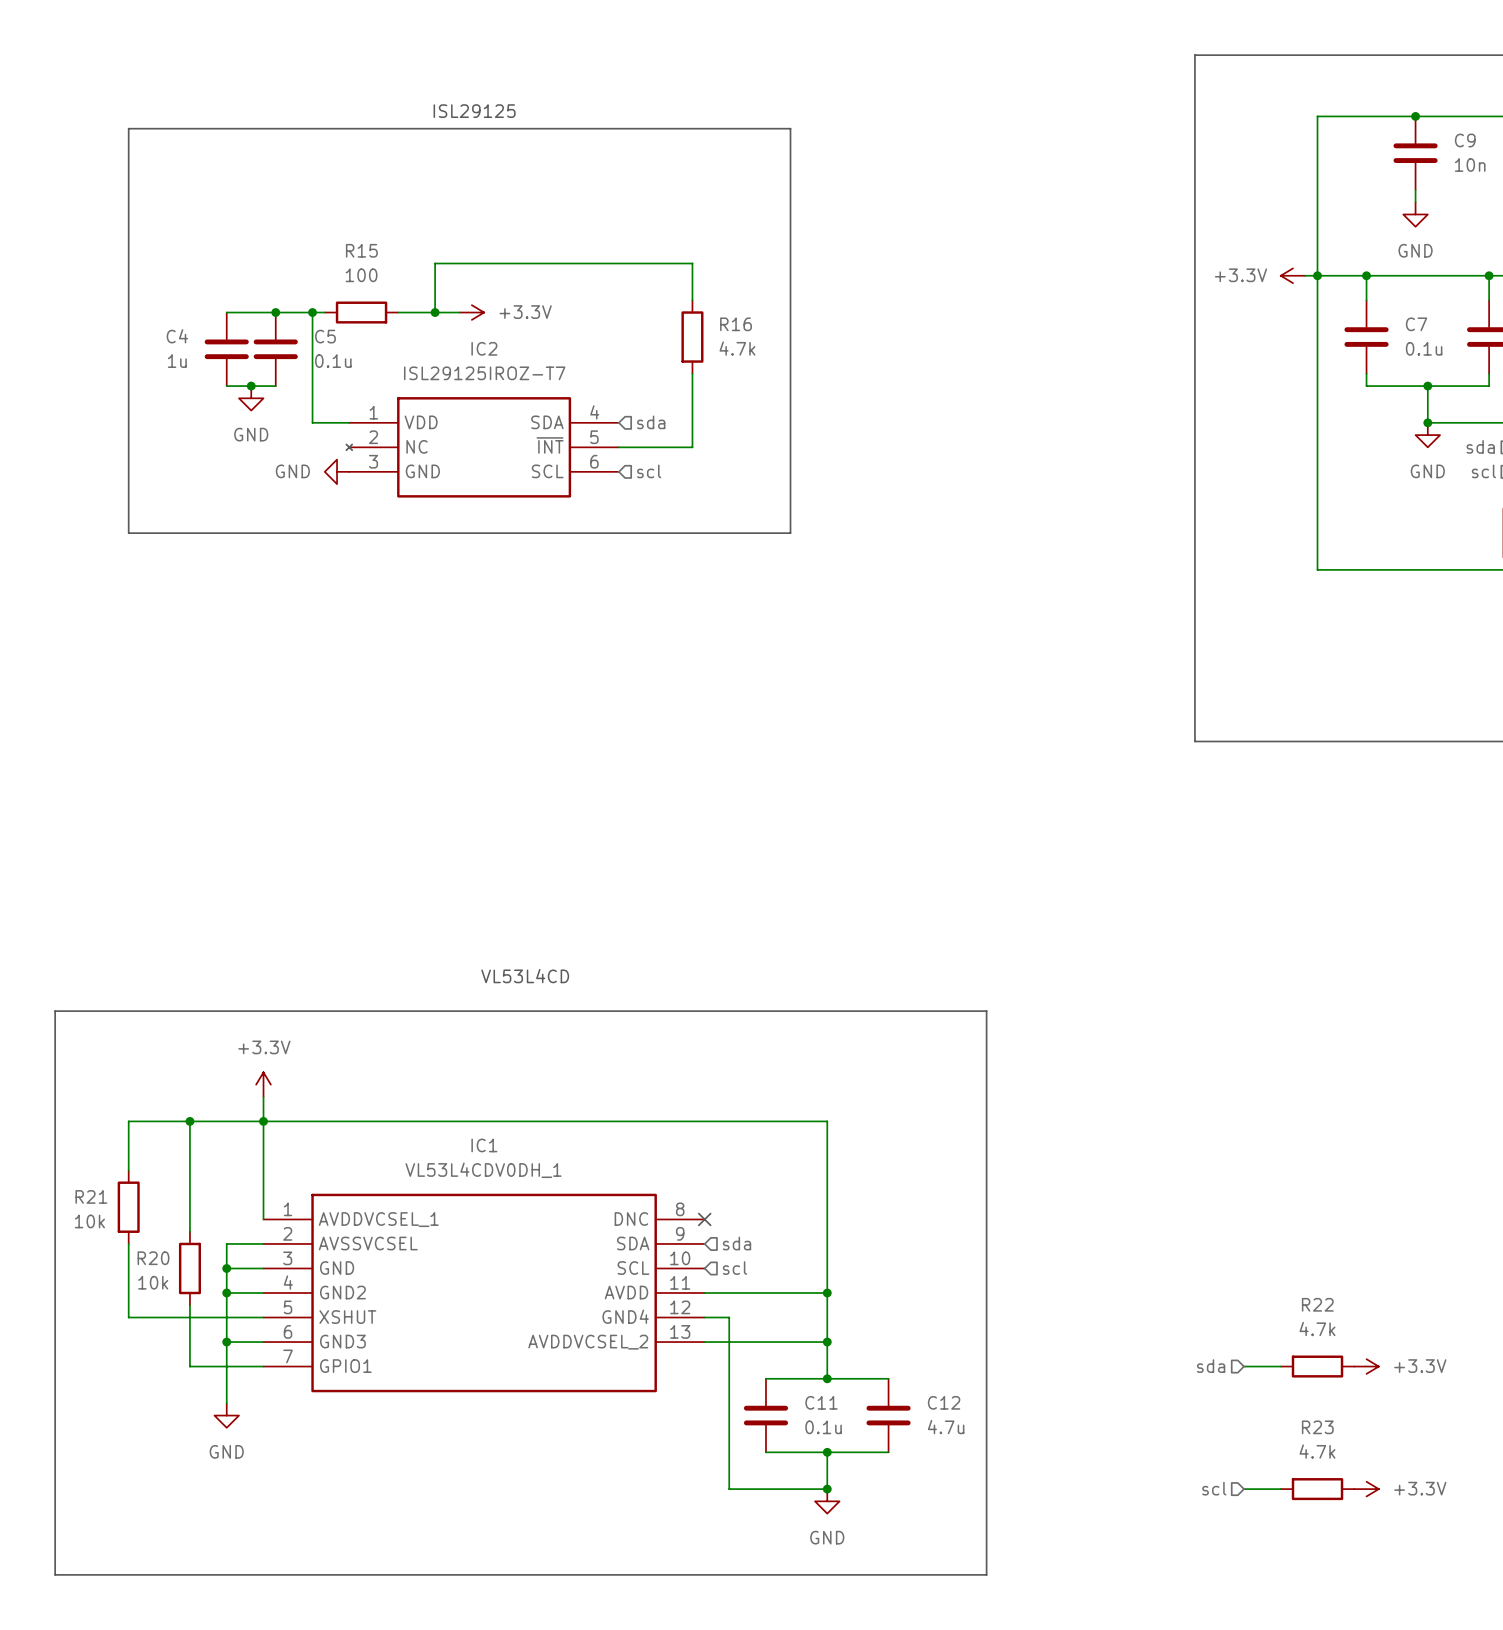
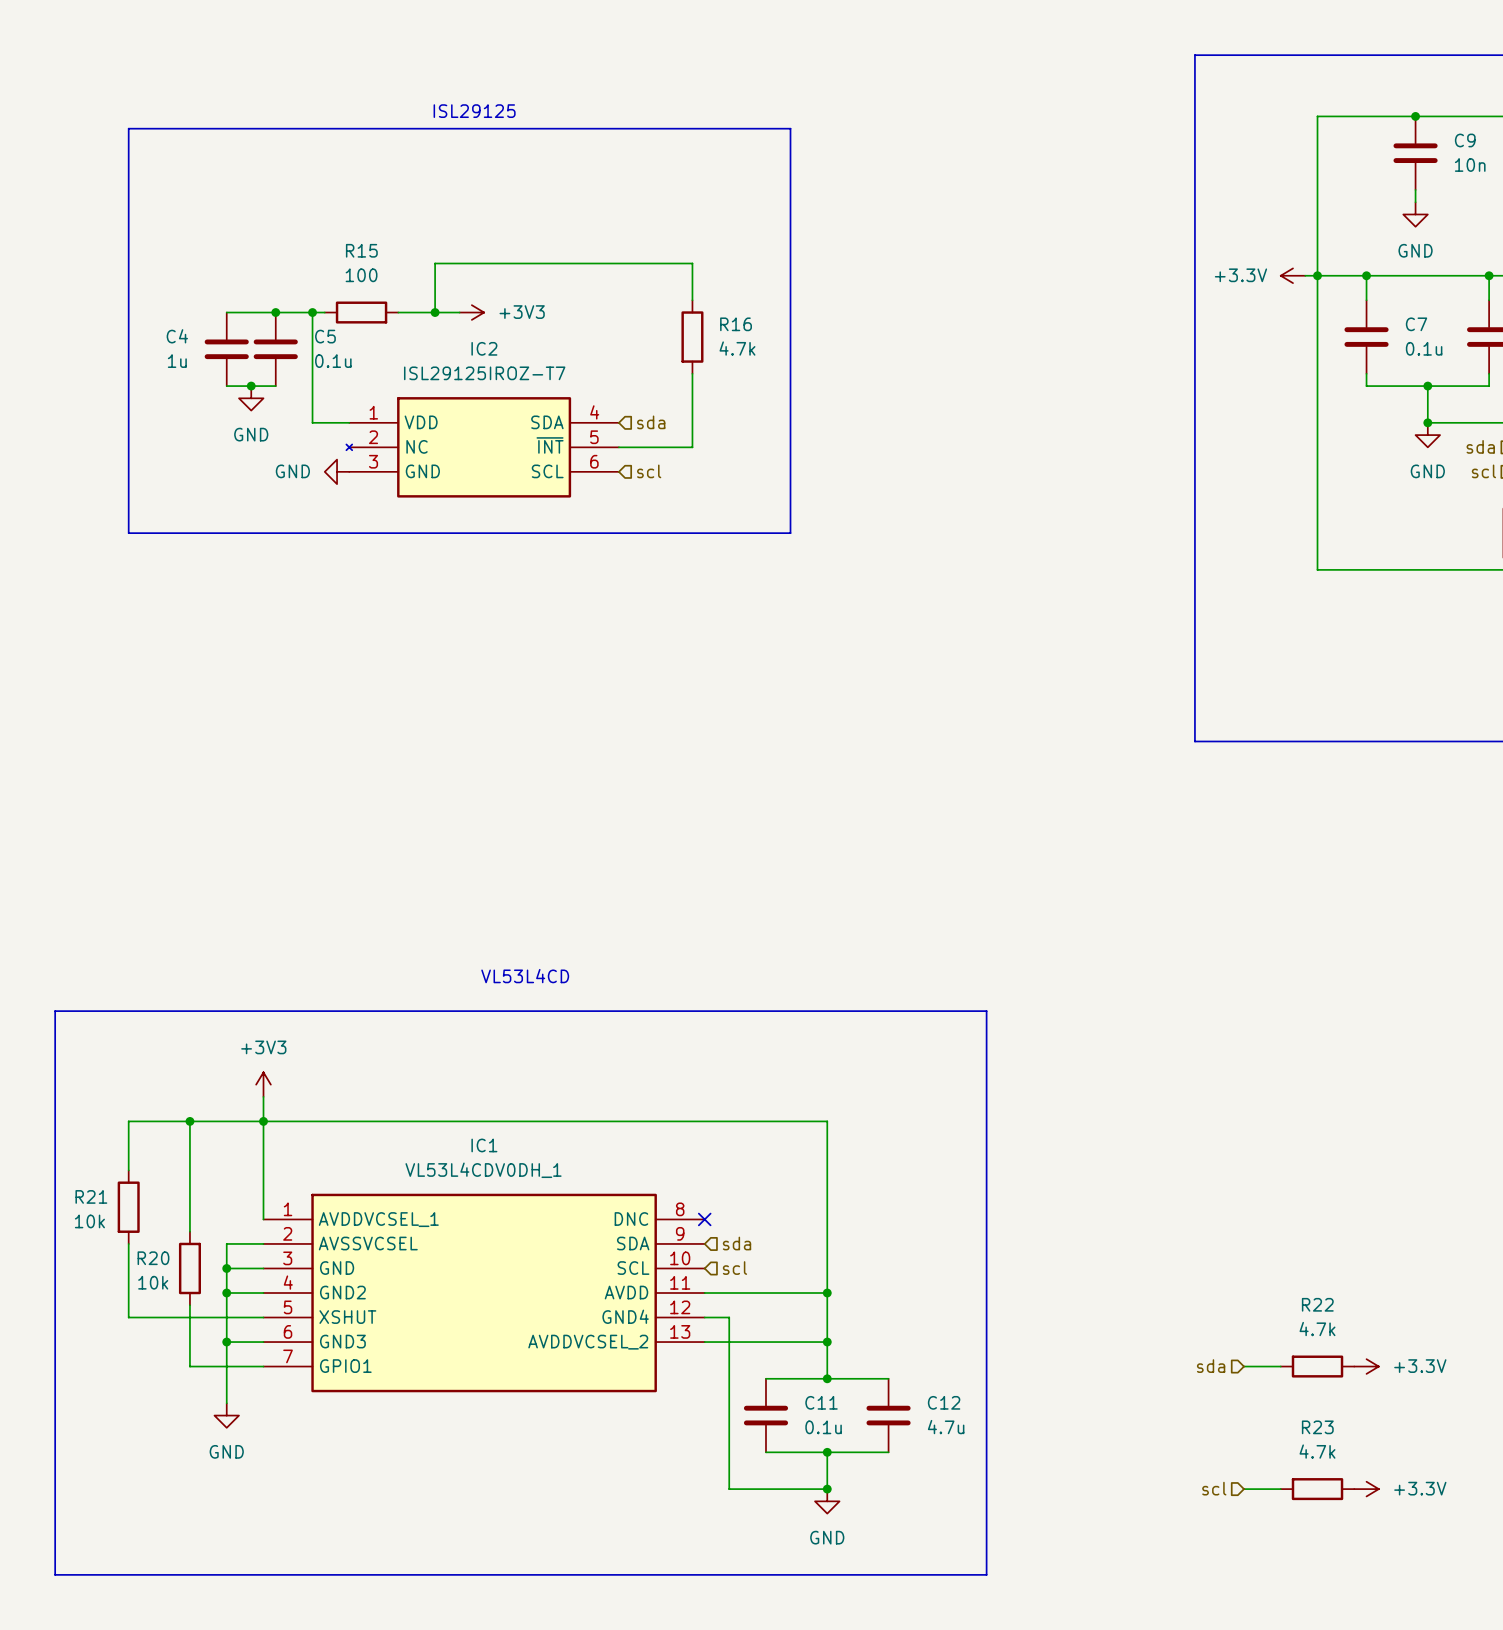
power symbol: +3.3V (471, 312) -> +3V3 (471, 312)
power symbol: +3.3V (263, 1084) -> +3V3 (263, 1084)

